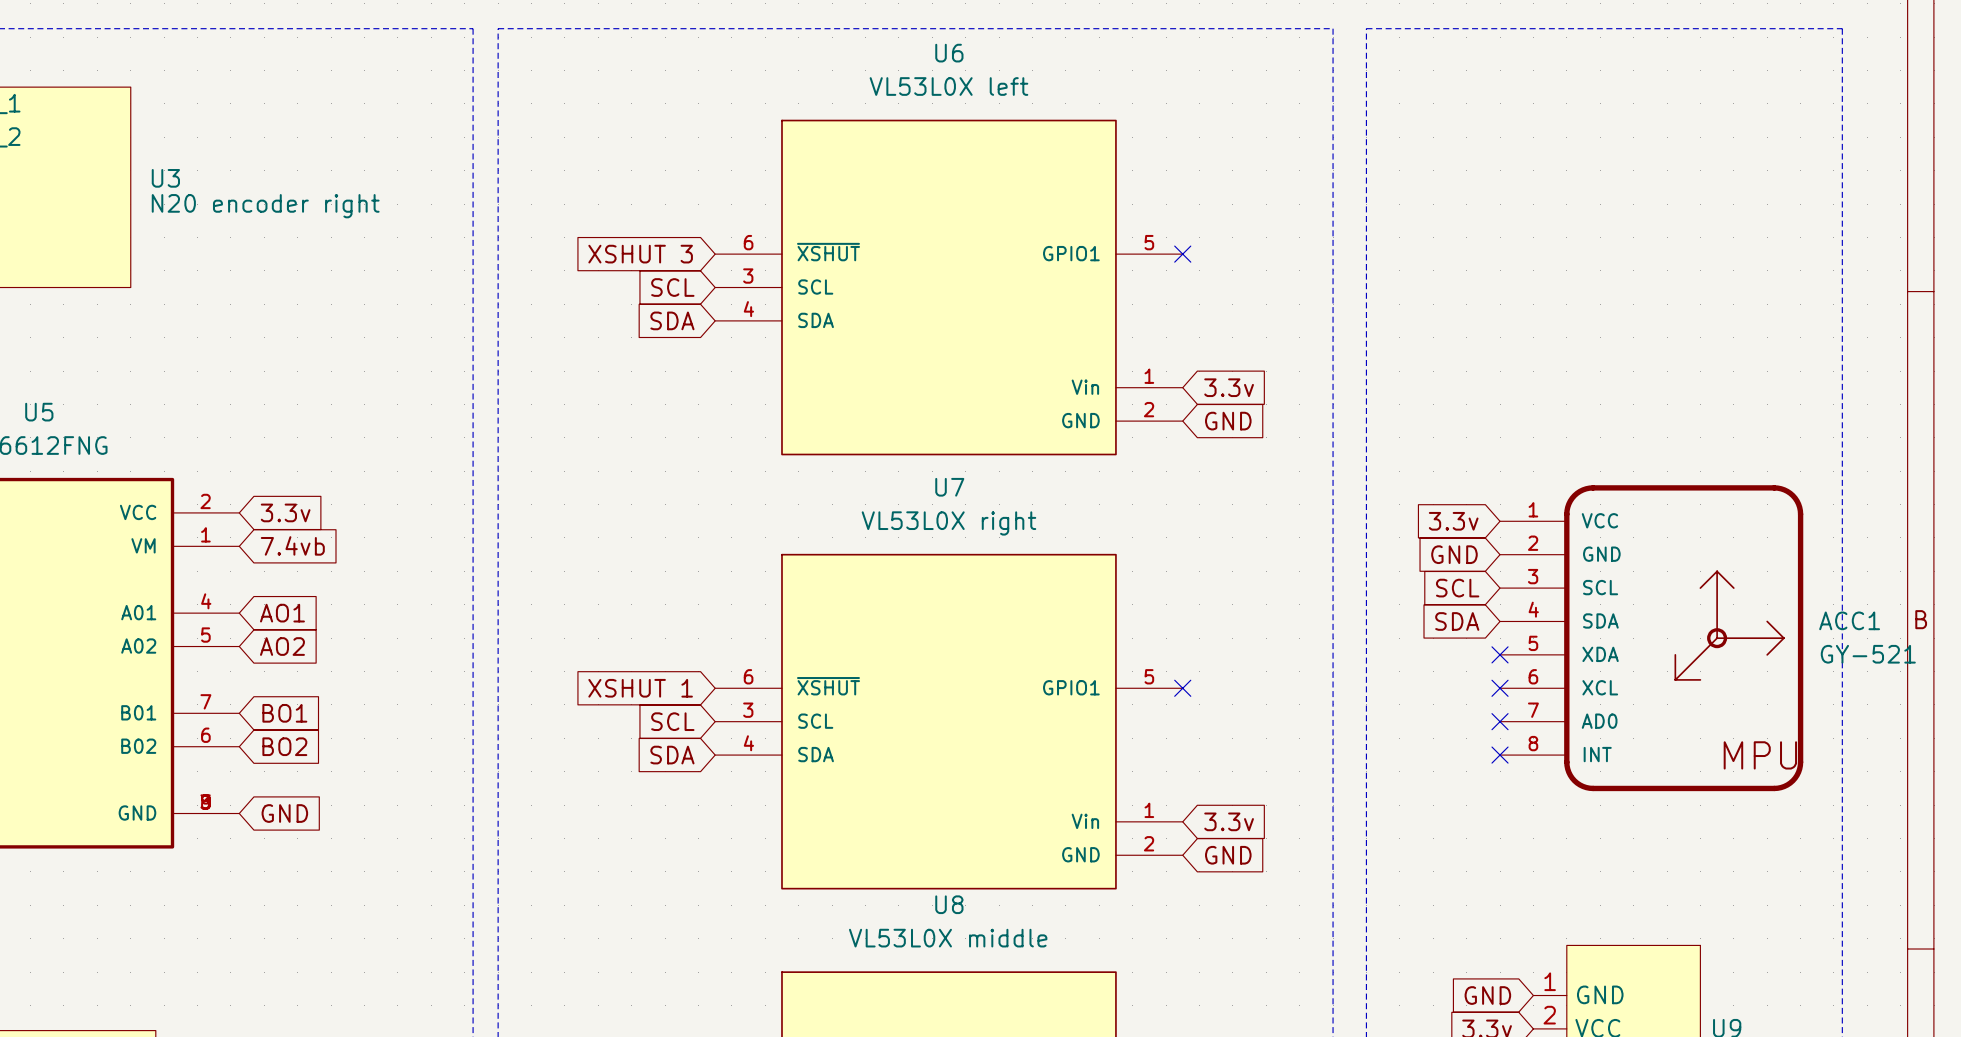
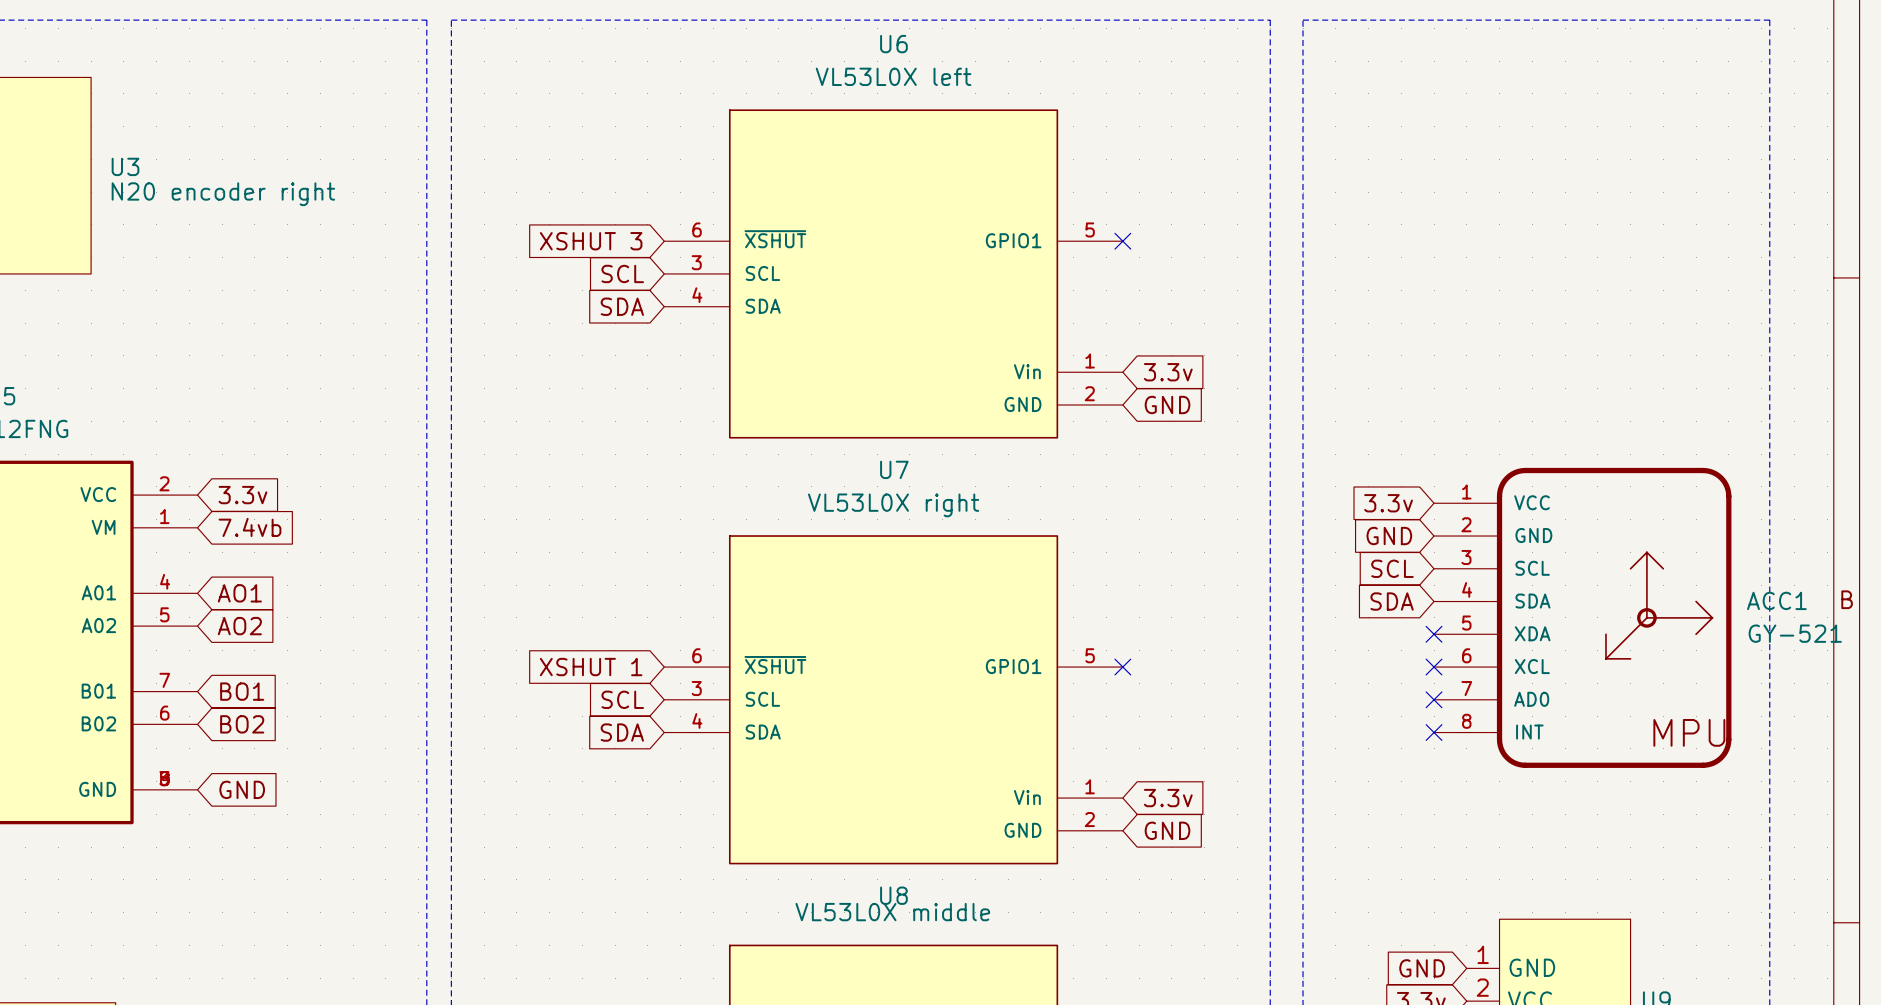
U8 name position: U8 (949, 904) -> U8 (893, 895)

